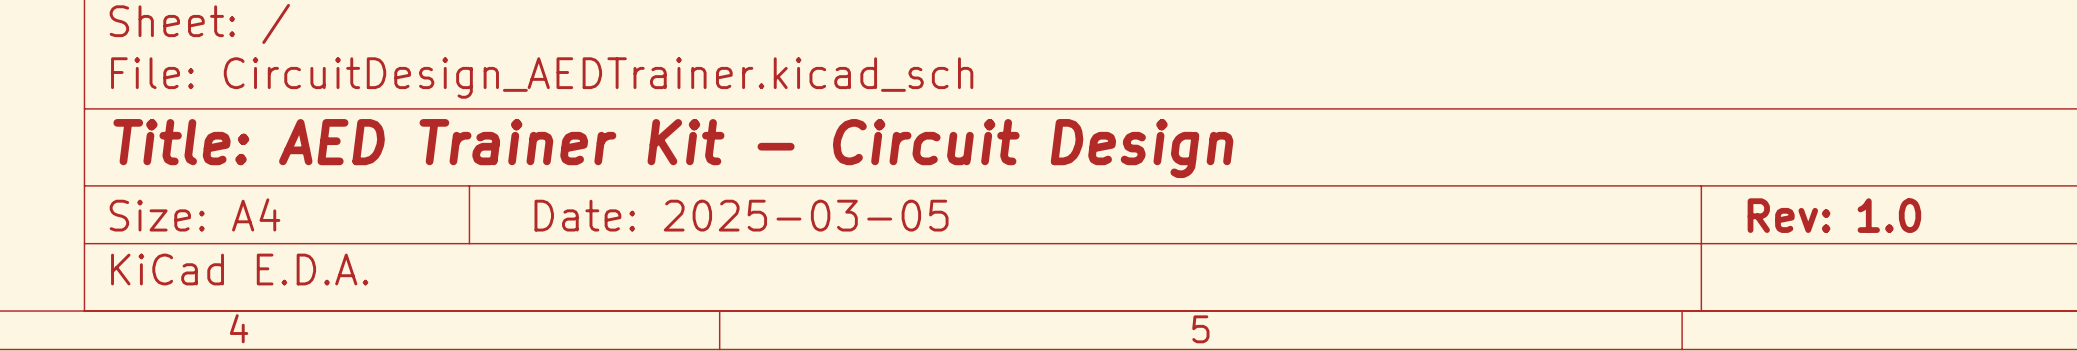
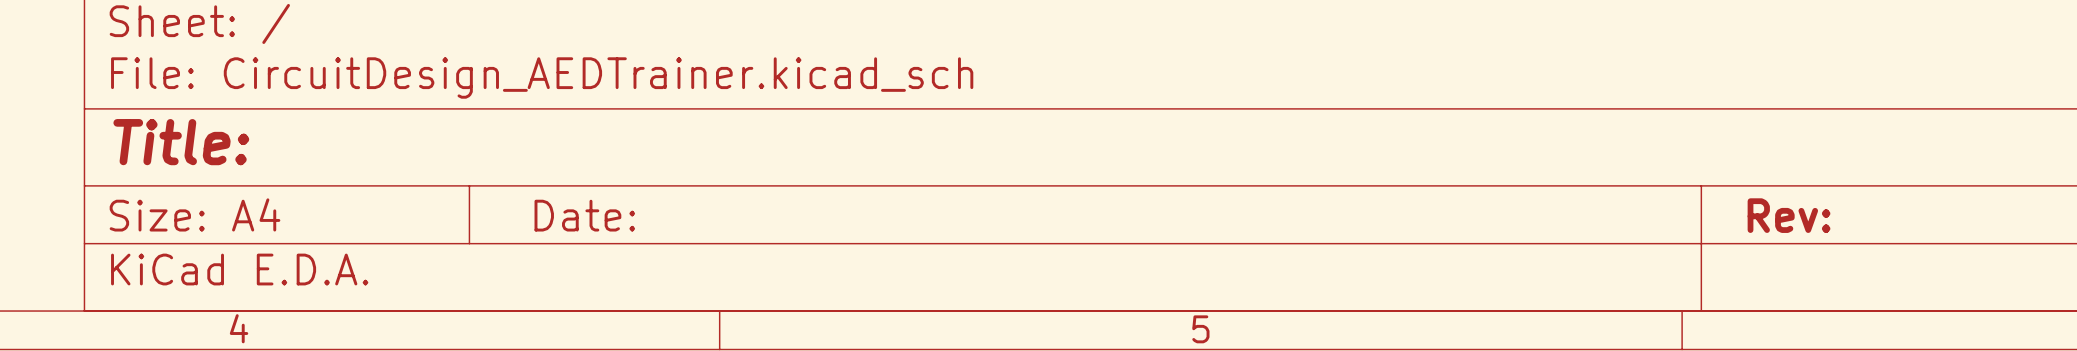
title block: Title: AED Trainer Kit - Circuit Design (673, 148) -> Title: (181, 142)
title block: Date: 2025-03-05 (741, 215) -> Date: (584, 215)
title block: Rev: 1.0 (1834, 215) -> Rev: (1789, 215)

